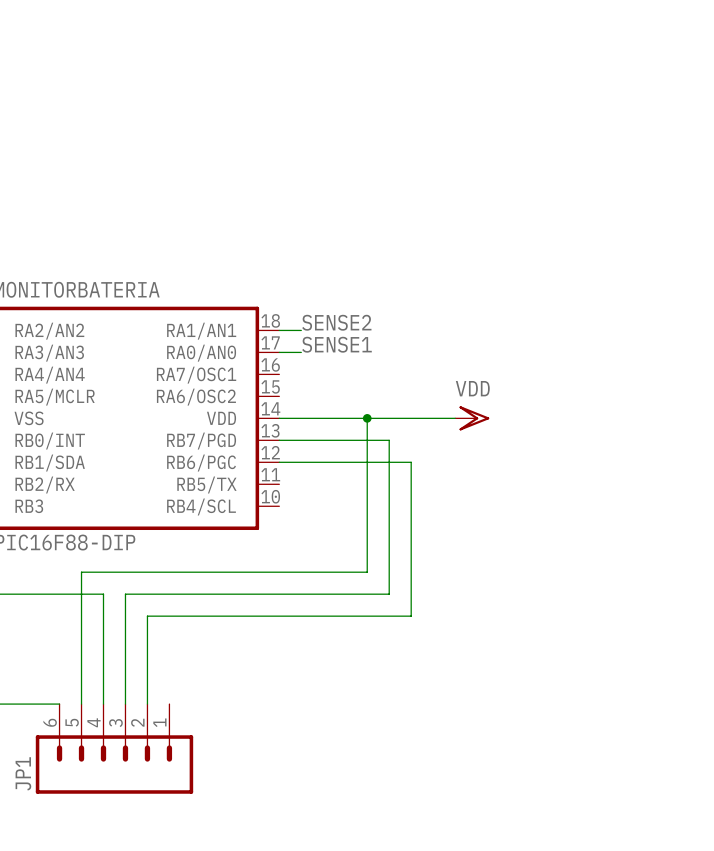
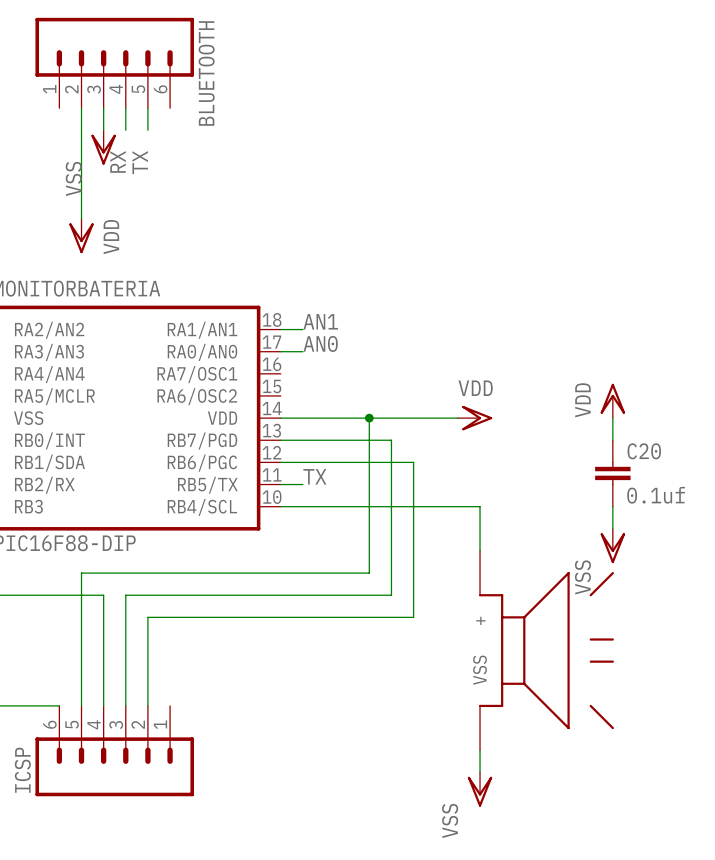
BLUETOOTH: none -> (114, 63)
wire: none -> (81, 108) (81, 218)
wire: none -> (103, 108) (103, 130)
wire: none -> (125, 108) (125, 130)
wire: none -> (147, 108) (147, 130)
power symbol: none -> VSS (103, 147)
label: none -> RX (118, 161)
label: none -> TX (140, 162)
power symbol: none -> VDD (81, 236)
label: SENSE2 (336, 322) -> AN1 (320, 321)
label: SENSE1 (336, 344) -> AN0 (320, 343)
power symbol: none -> VDD (612, 400)
wire: none -> (612, 418) (612, 440)
C20: none -> 0.1uf (612, 473)
label: none -> TX (314, 476)
wire: none -> (280, 484) (302, 484)
wire: none -> (280, 506) (480, 506) (480, 550)
wire: none -> (612, 506) (612, 528)
power symbol: none -> VSS (612, 545)
part: none -> (546, 650)
wire: none -> (480, 750) (480, 772)
JP1 name: JP1 (23, 773) -> ICSP (22, 770)
power symbol: none -> VSS (480, 789)

